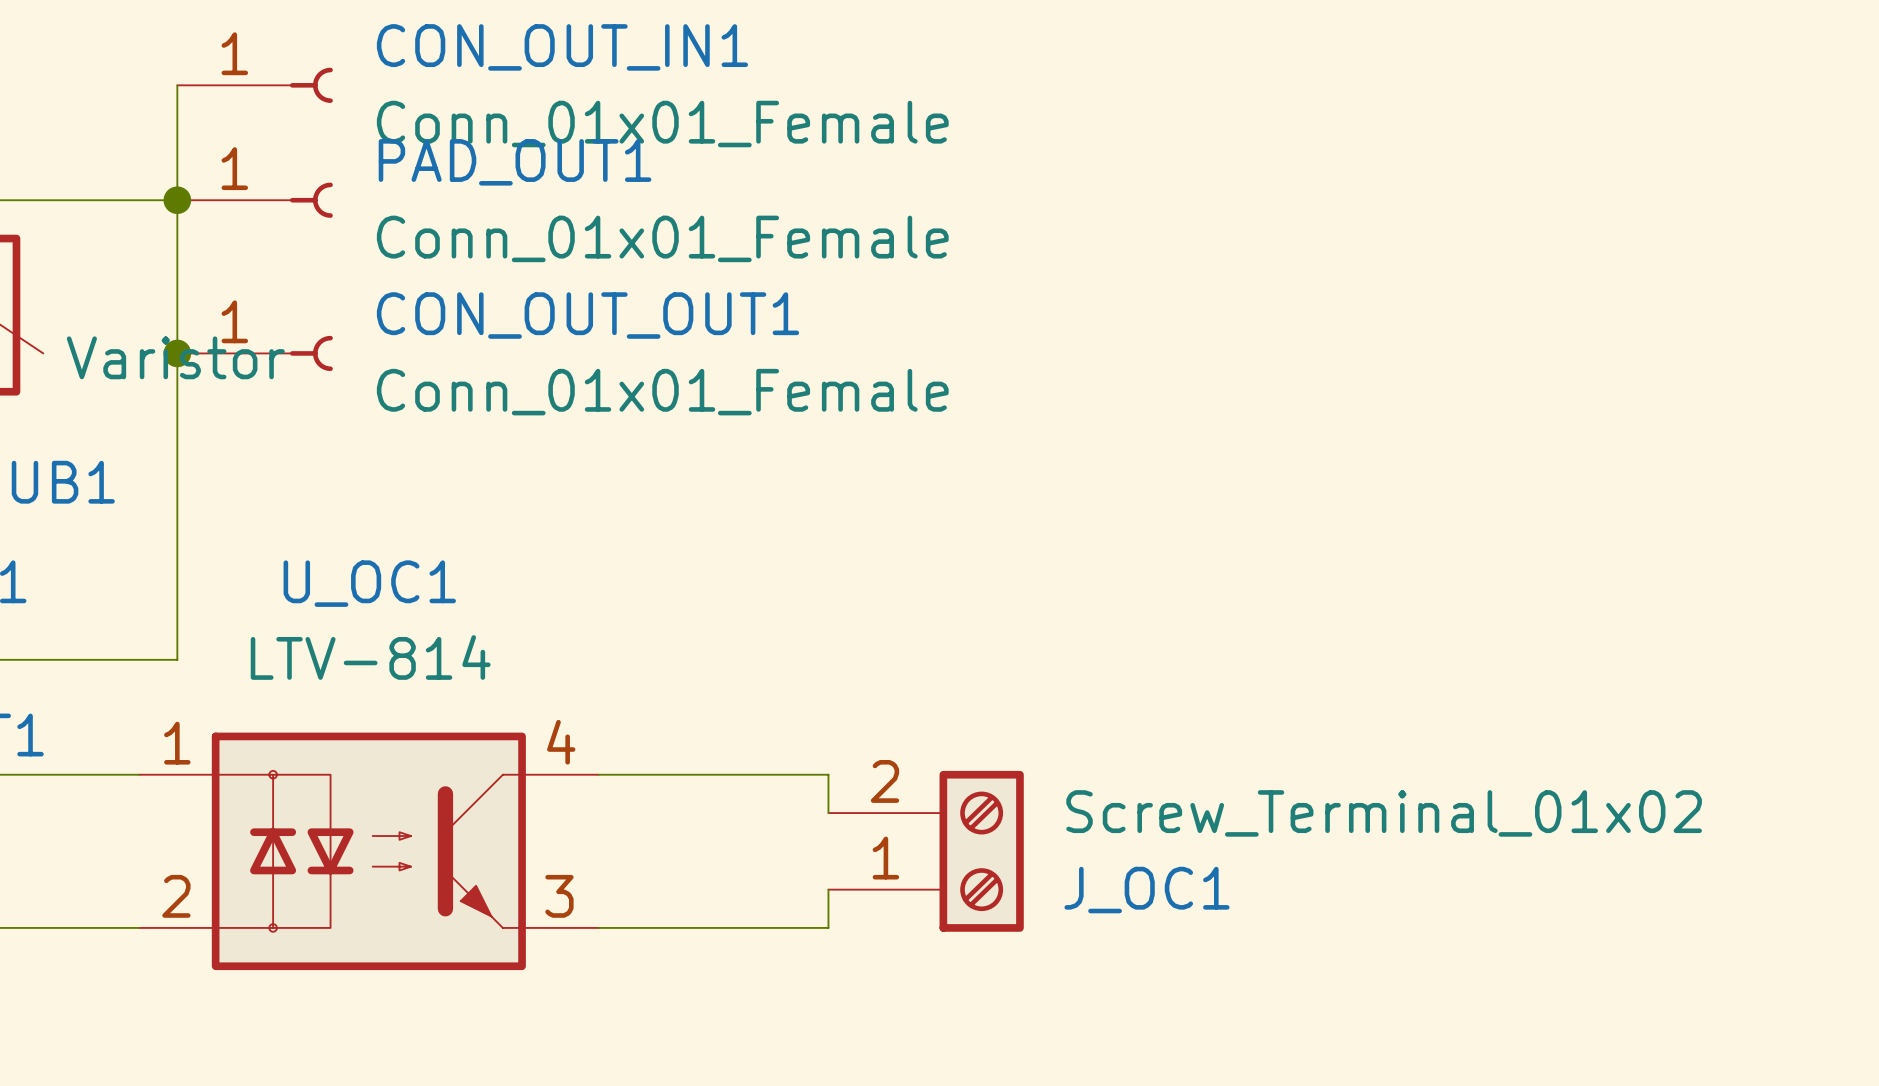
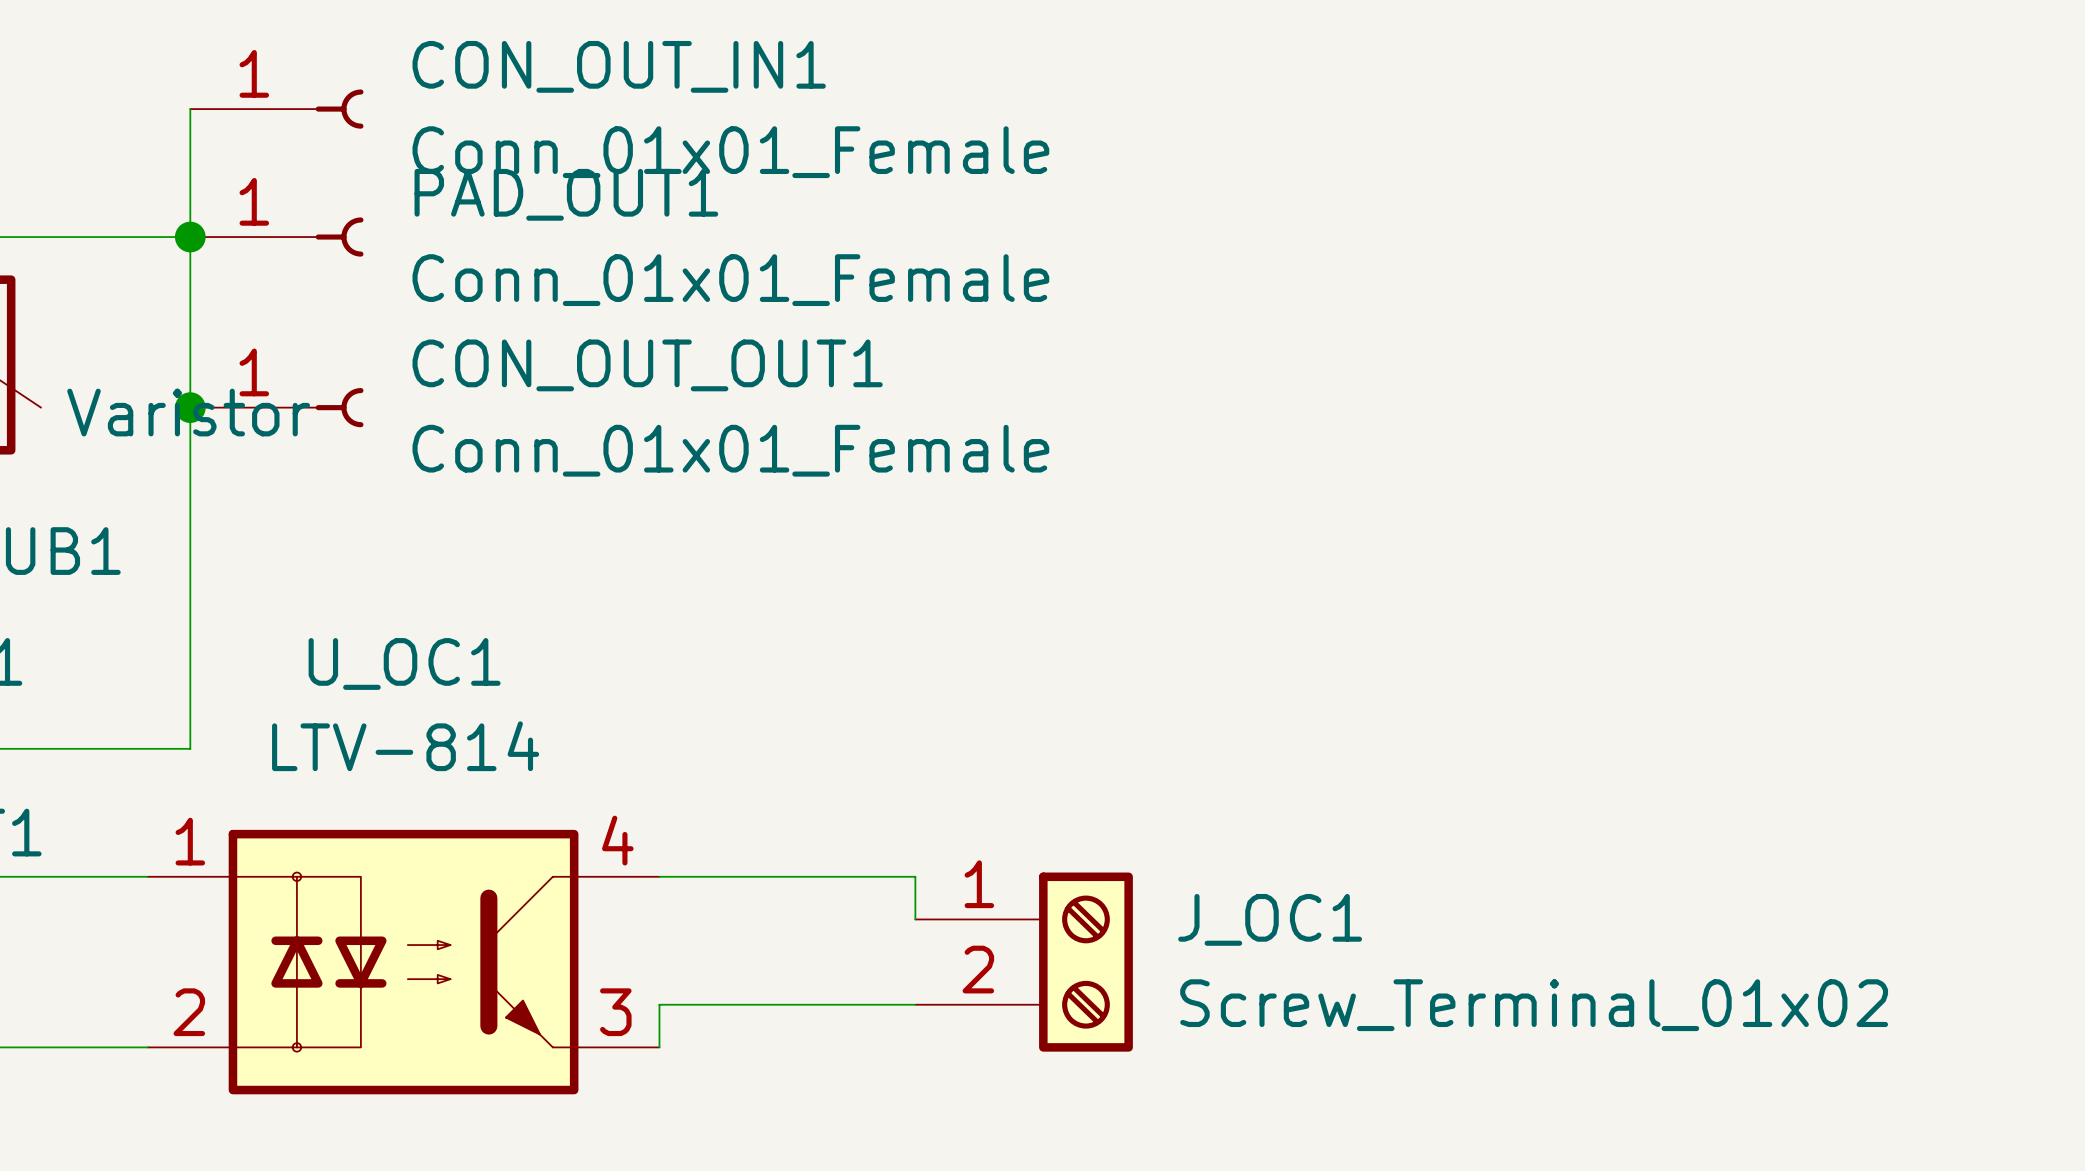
J_OC1 flip: as is (981, 851) -> up-down (1085, 962)
wire: (828, 889) (828, 927) (598, 927) -> (915, 1004) (659, 1004) (659, 1047)

